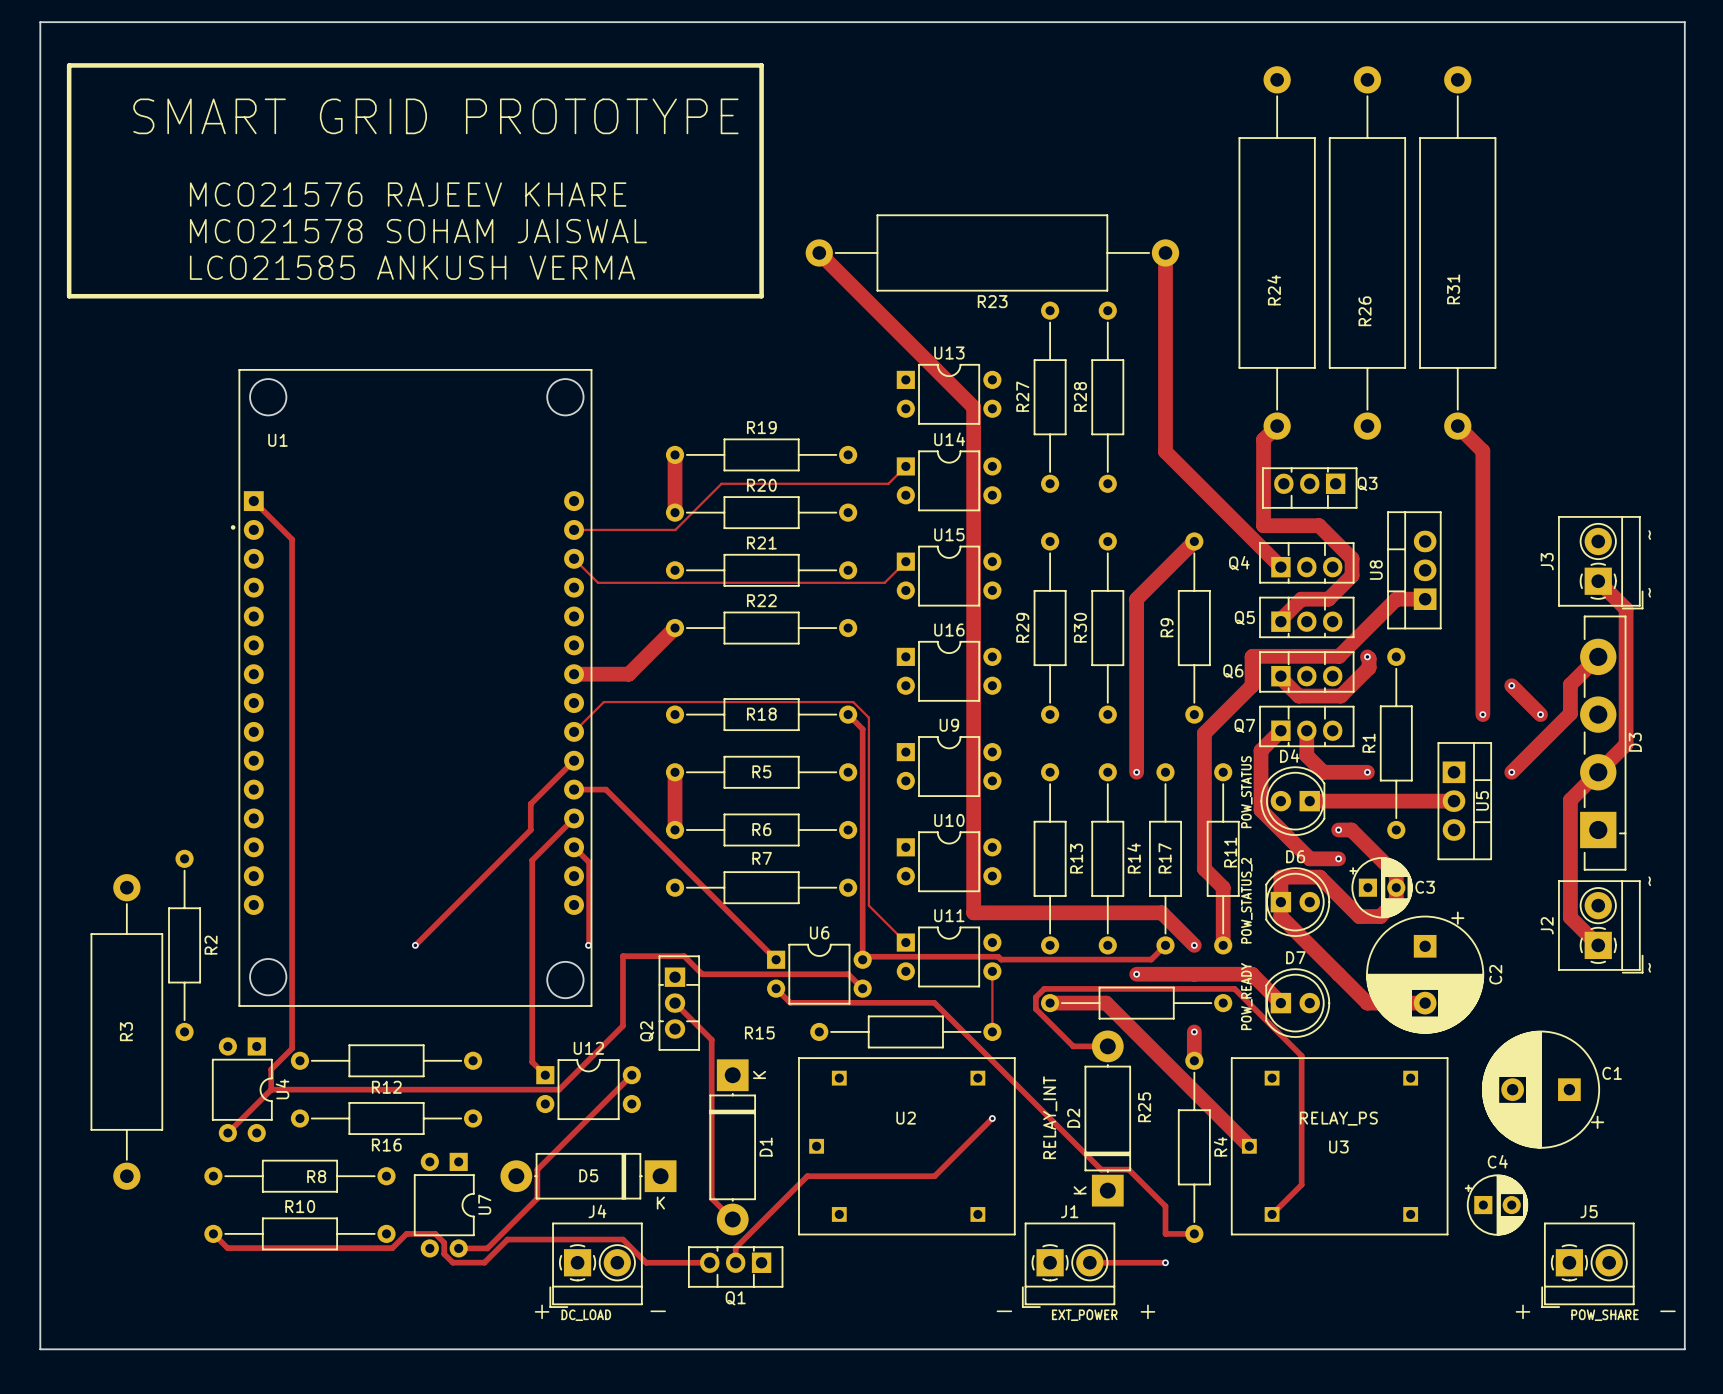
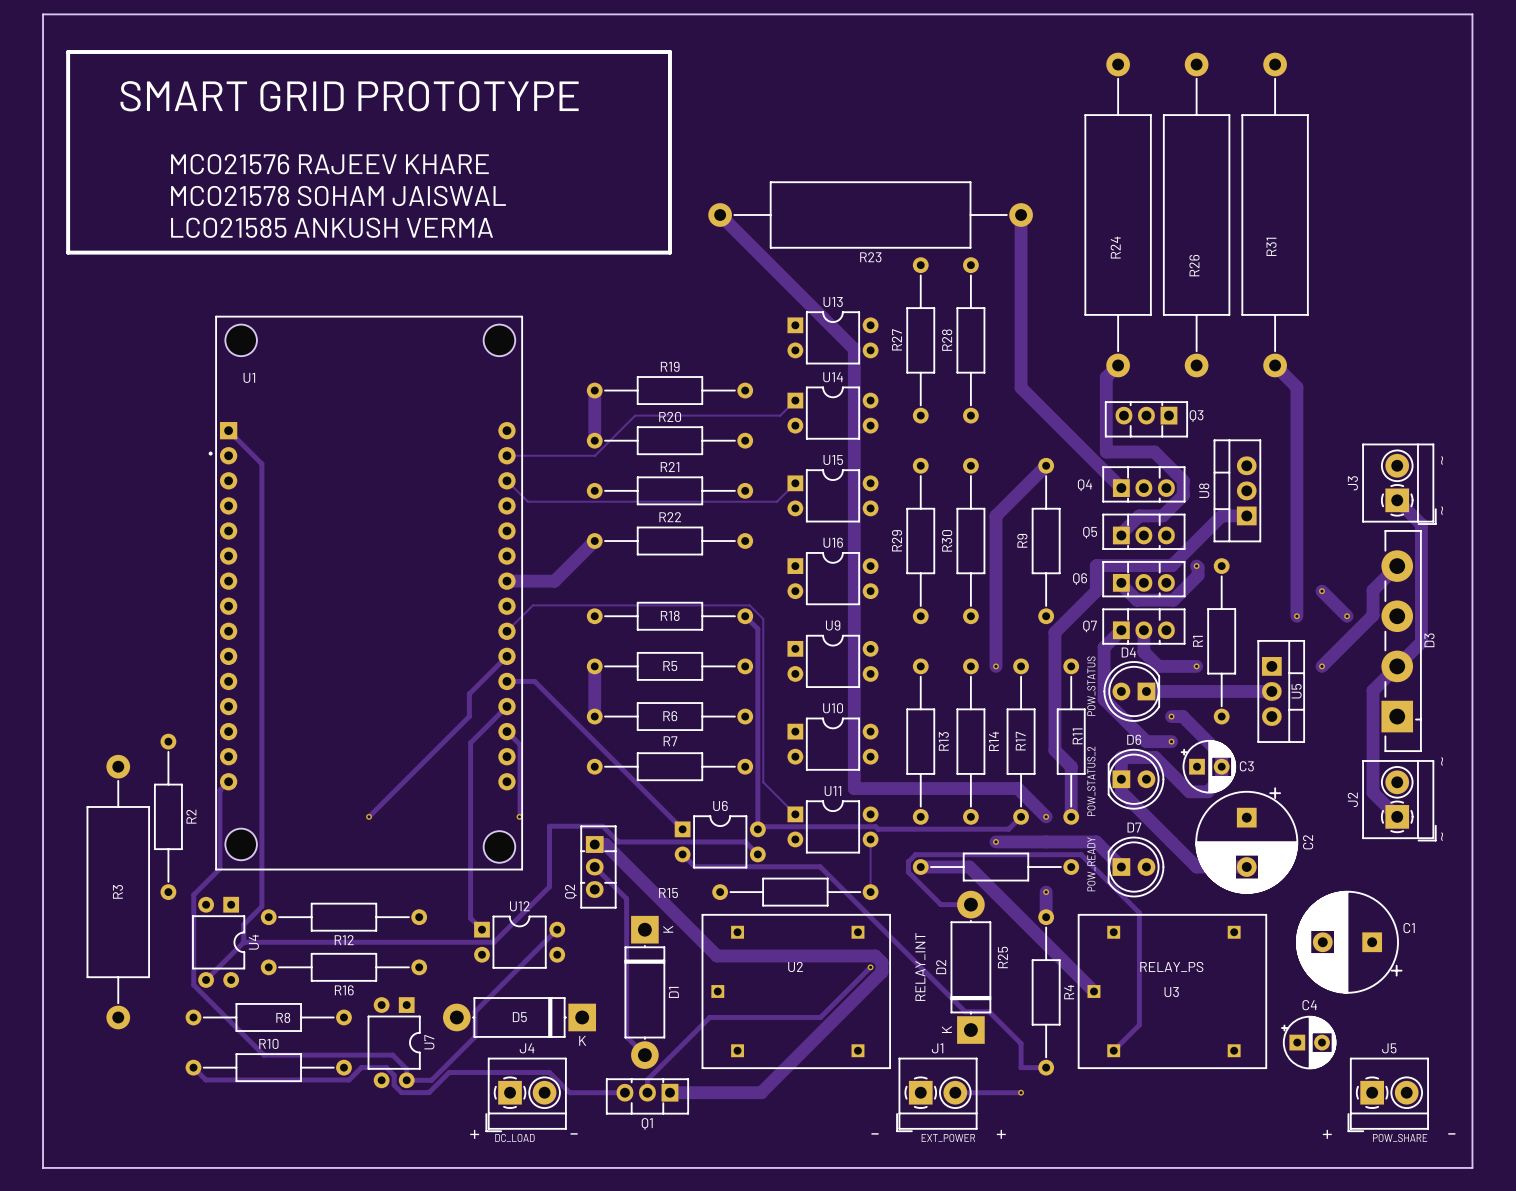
track: none -> (228, 781) (219, 790) (219, 868) (193, 894) (193, 985) (263, 1055) (392, 1055) (406, 1069) (406, 1080)
track: none -> (594, 844) (605, 844) (717, 955) (875, 955) (881, 962) (881, 972) (761, 1092) (669, 1092)

